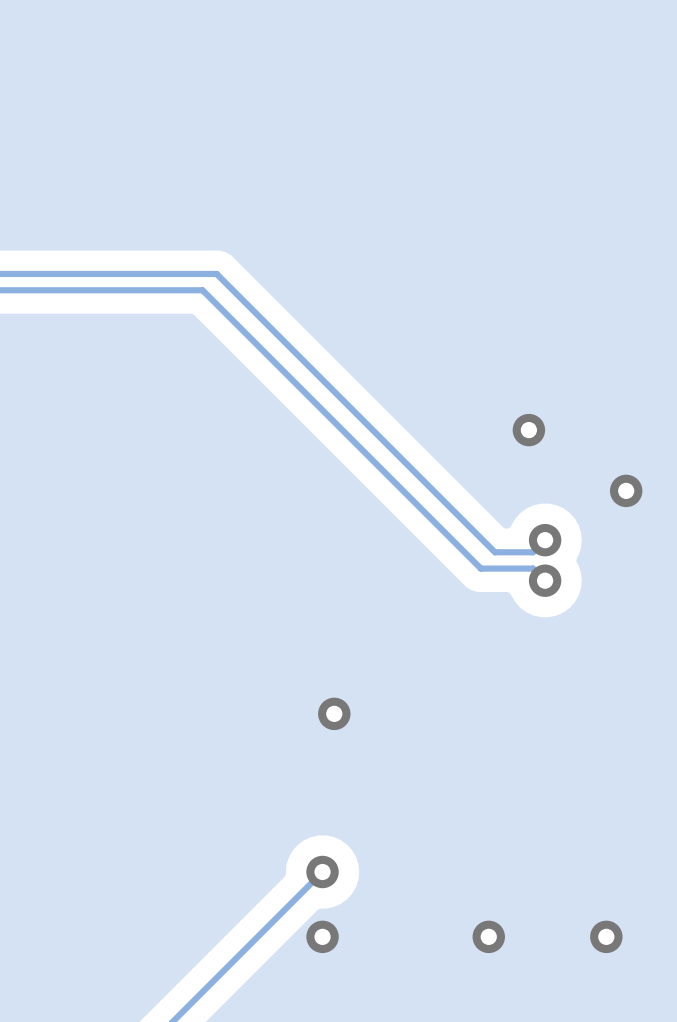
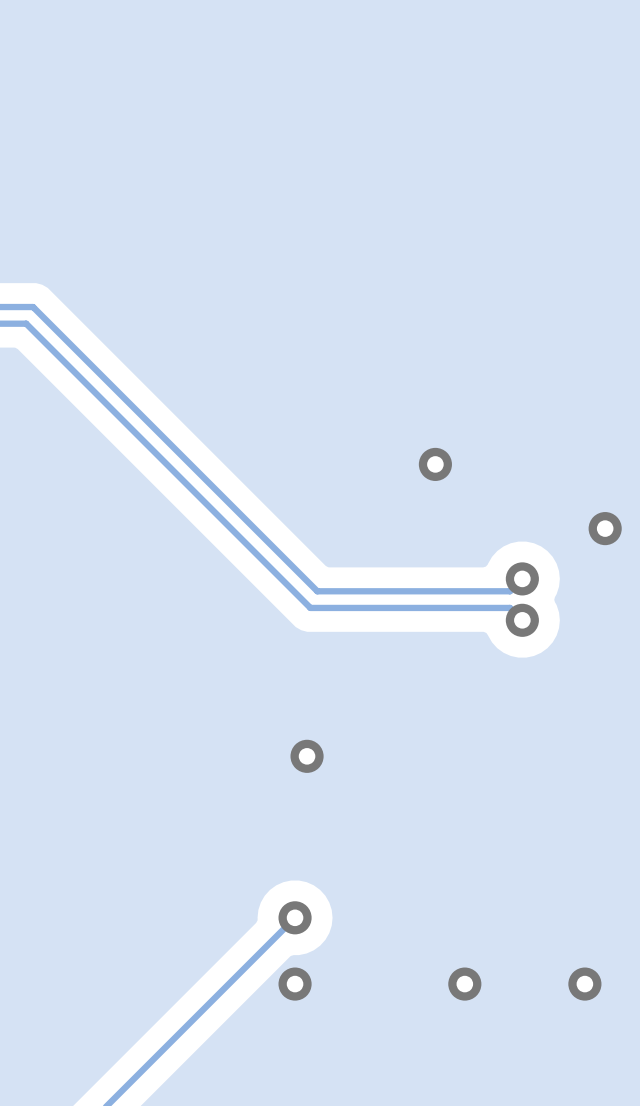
track: (66, 273) (216, 273) (494, 552) -> (33, 307) (317, 591) (471, 591)
track: (59, 290) (202, 290) (480, 568) -> (26, 323) (310, 607) (456, 607)
via position: (528, 430) -> (435, 464)

